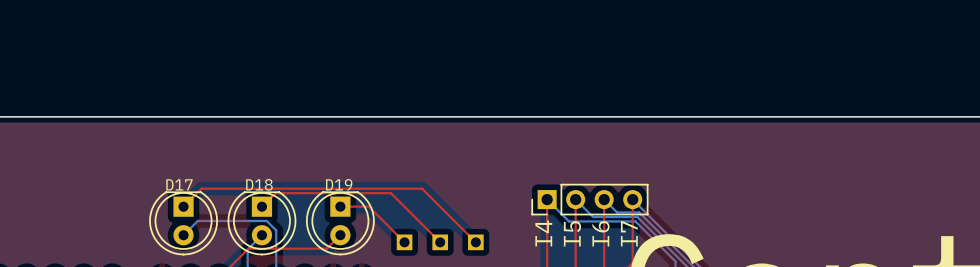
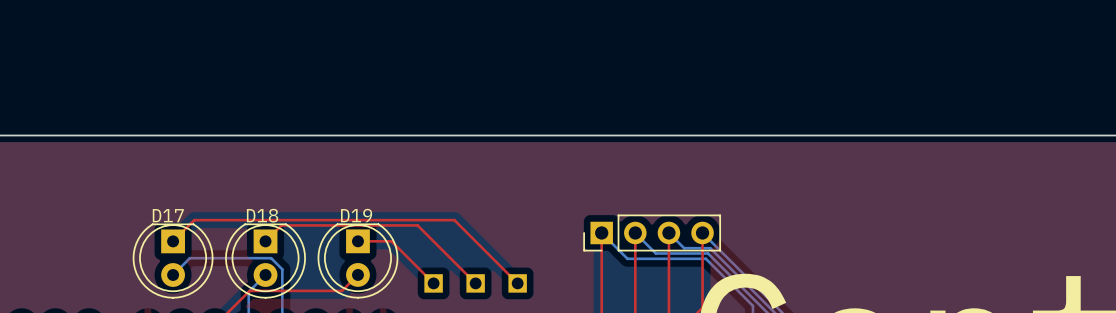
text: I4 (543, 233) -> none
text: I5 (572, 233) -> none
text: I6 (600, 233) -> none
text: I7 (629, 233) -> none

